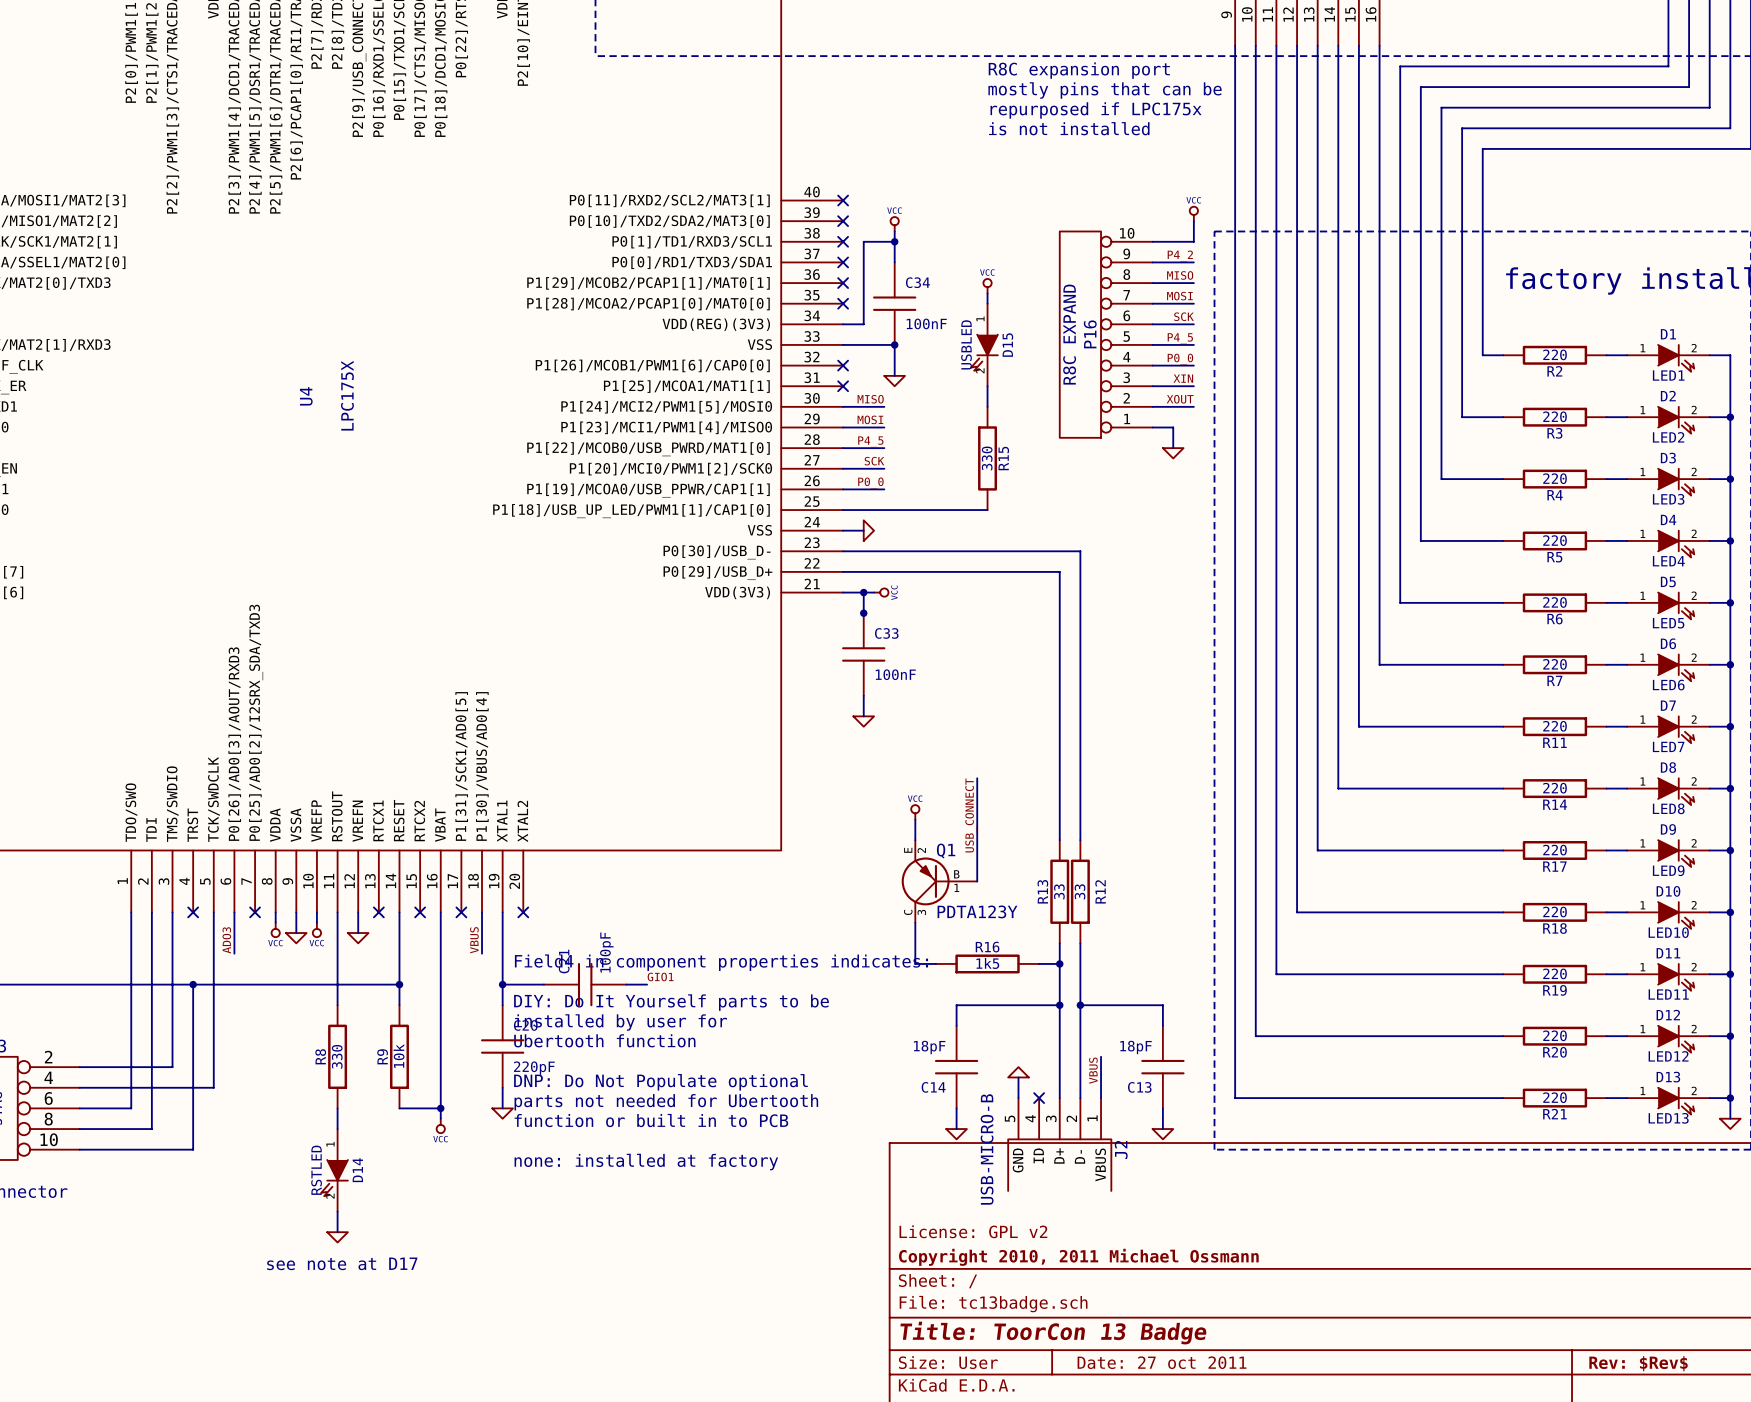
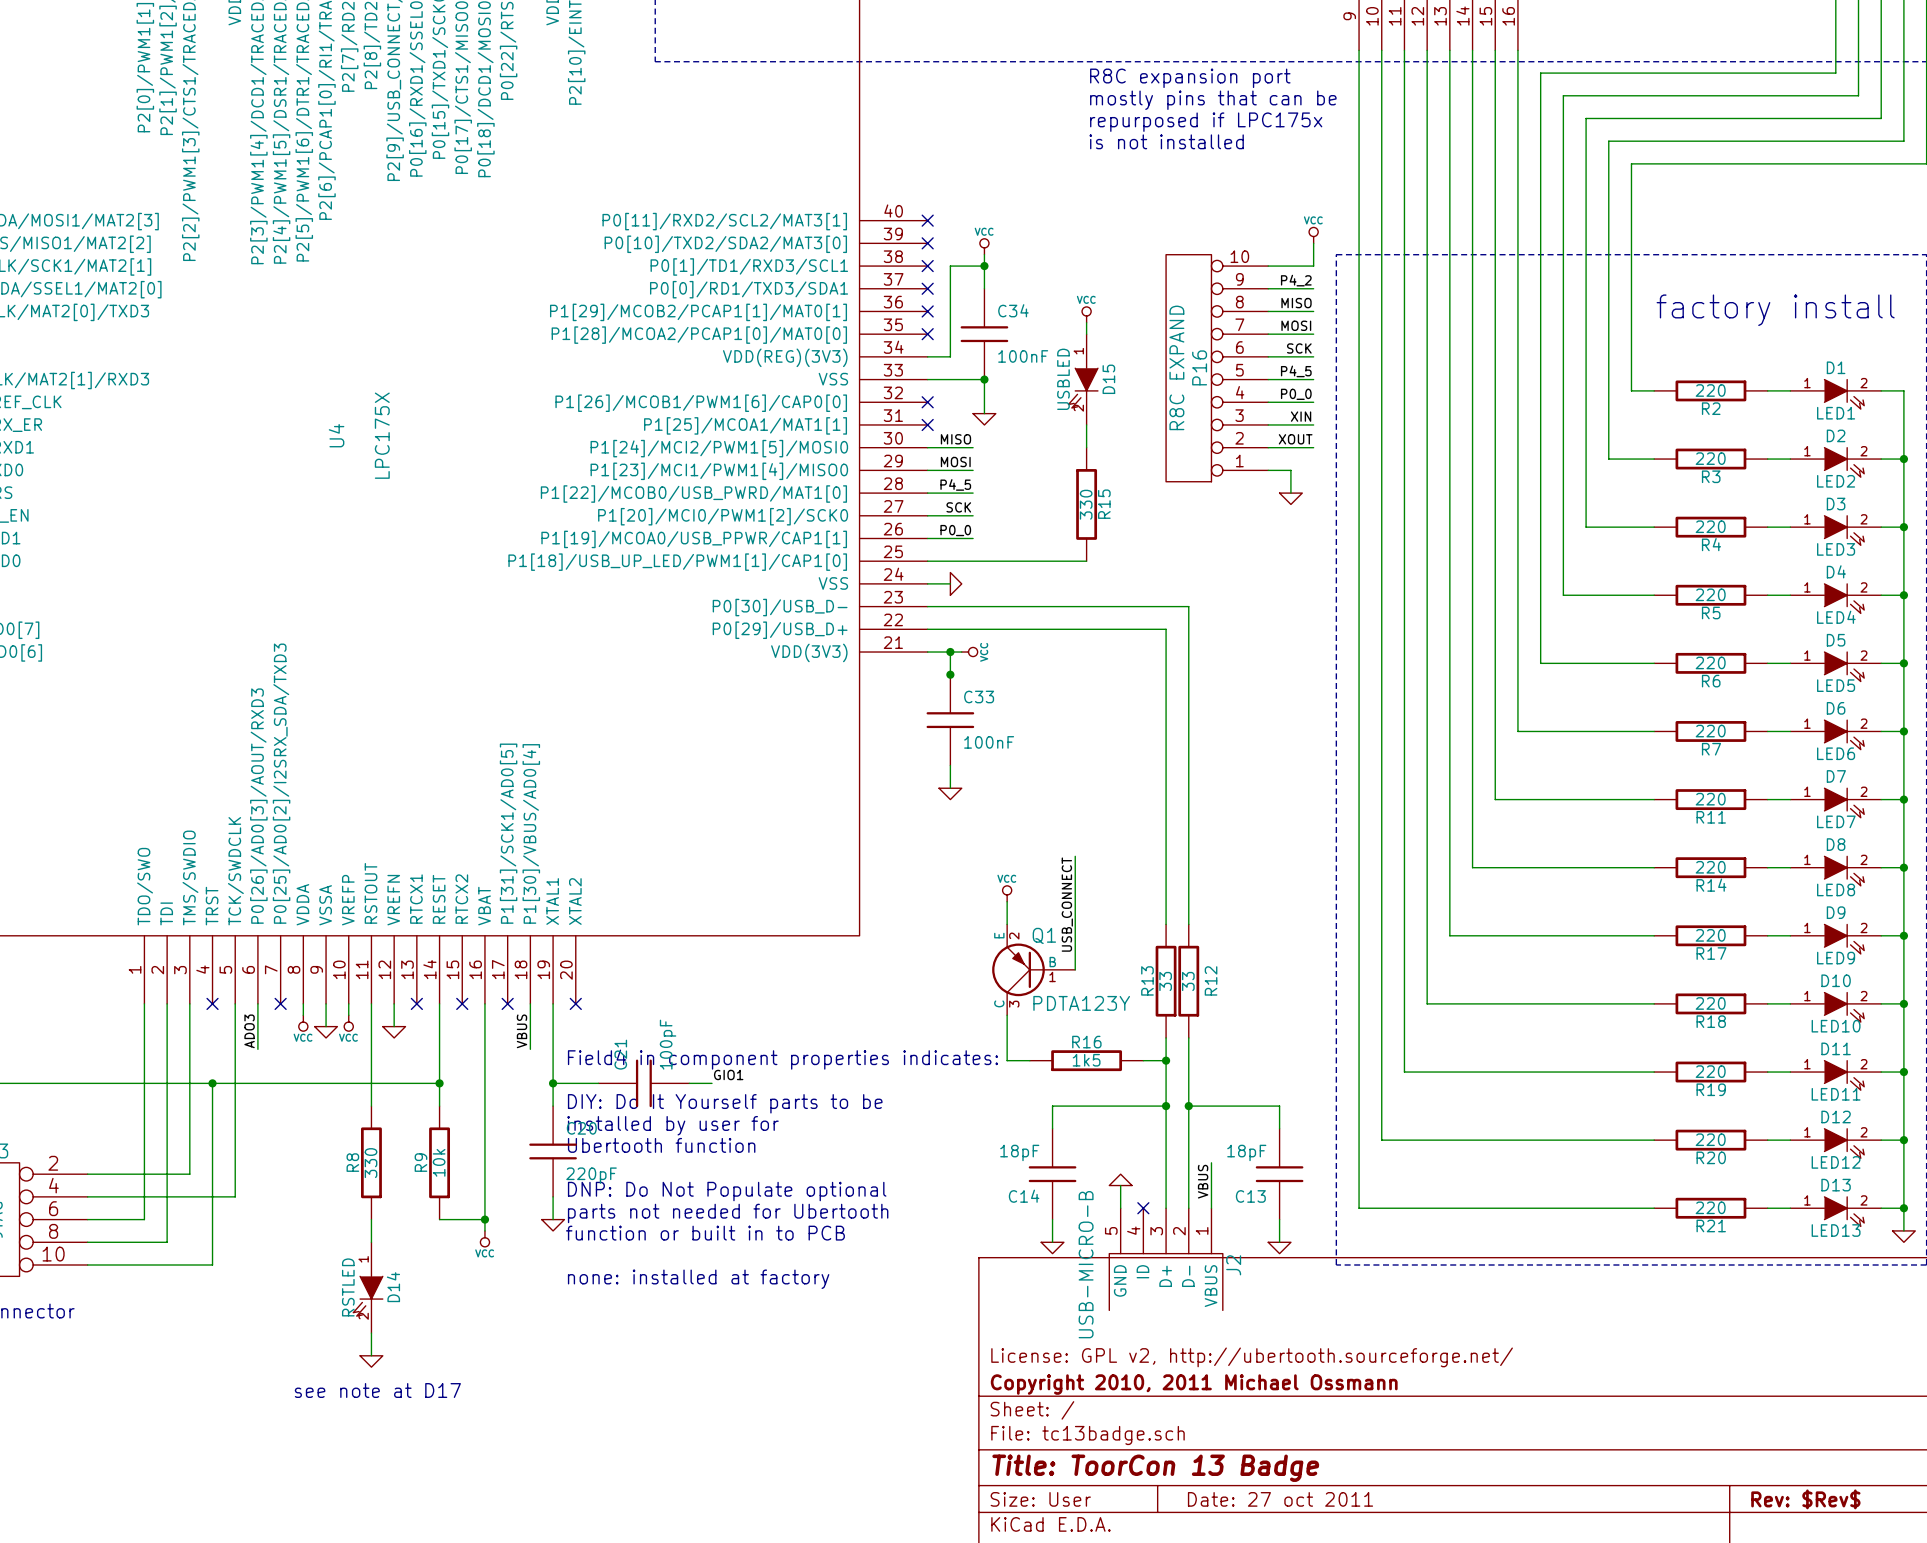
title block: License: GPL v2 (973, 1231) -> License: GPL v2, http://ubertooth.sourceforge.net/ (1252, 1357)

